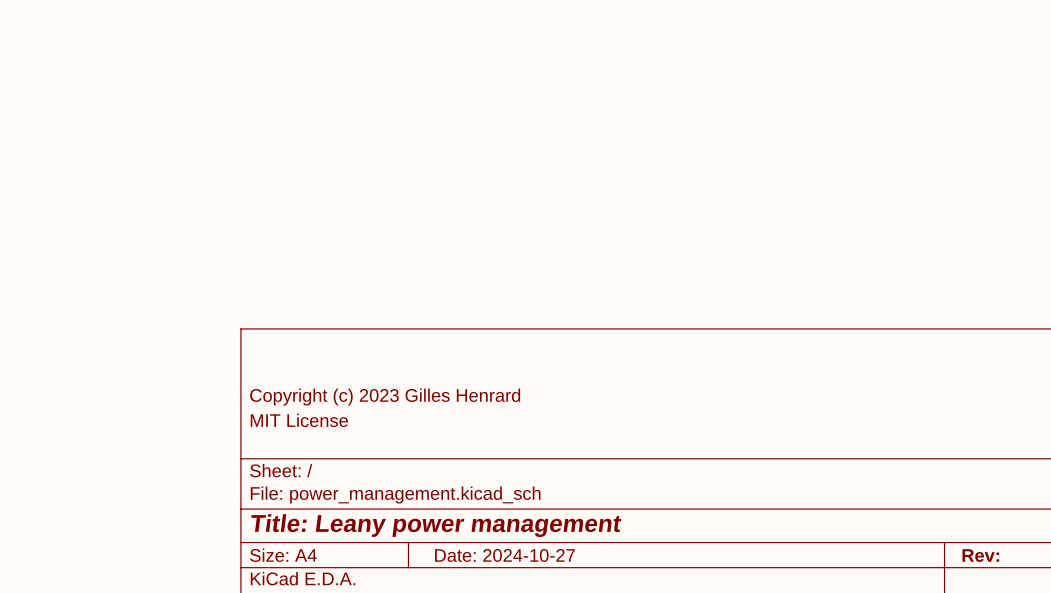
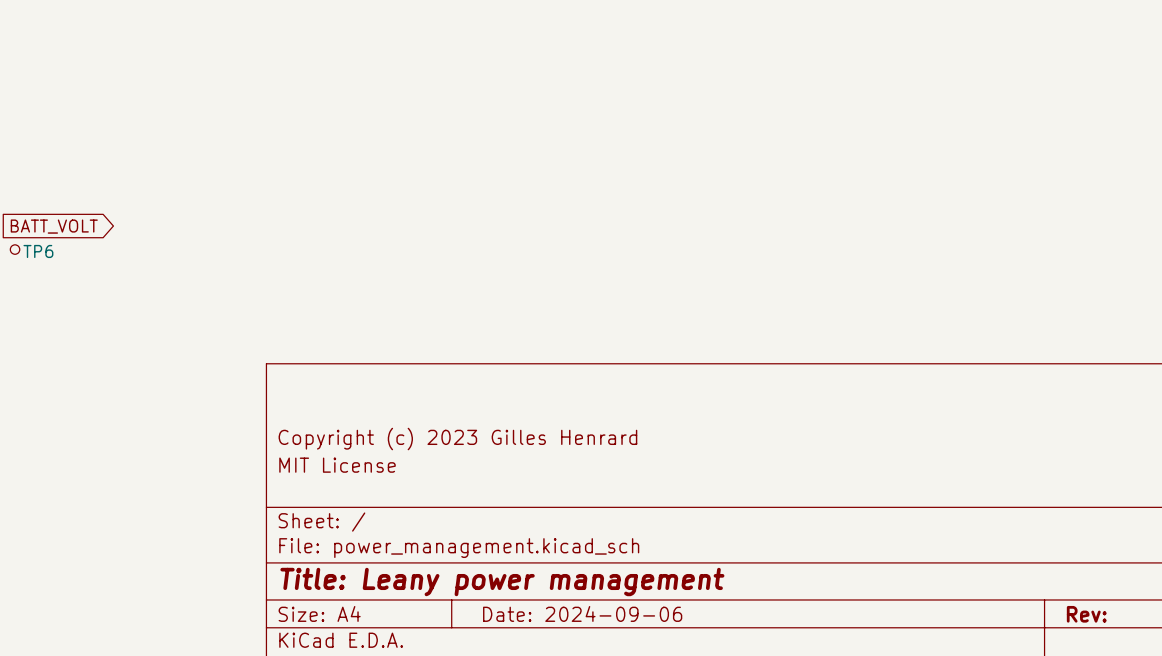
global label: none -> BATT_VOLT (54, 226)
TP6: none -> (15, 249)
title block: Date: 2024-10-27 (504, 555) -> Date: 2024-09-06 (582, 613)

